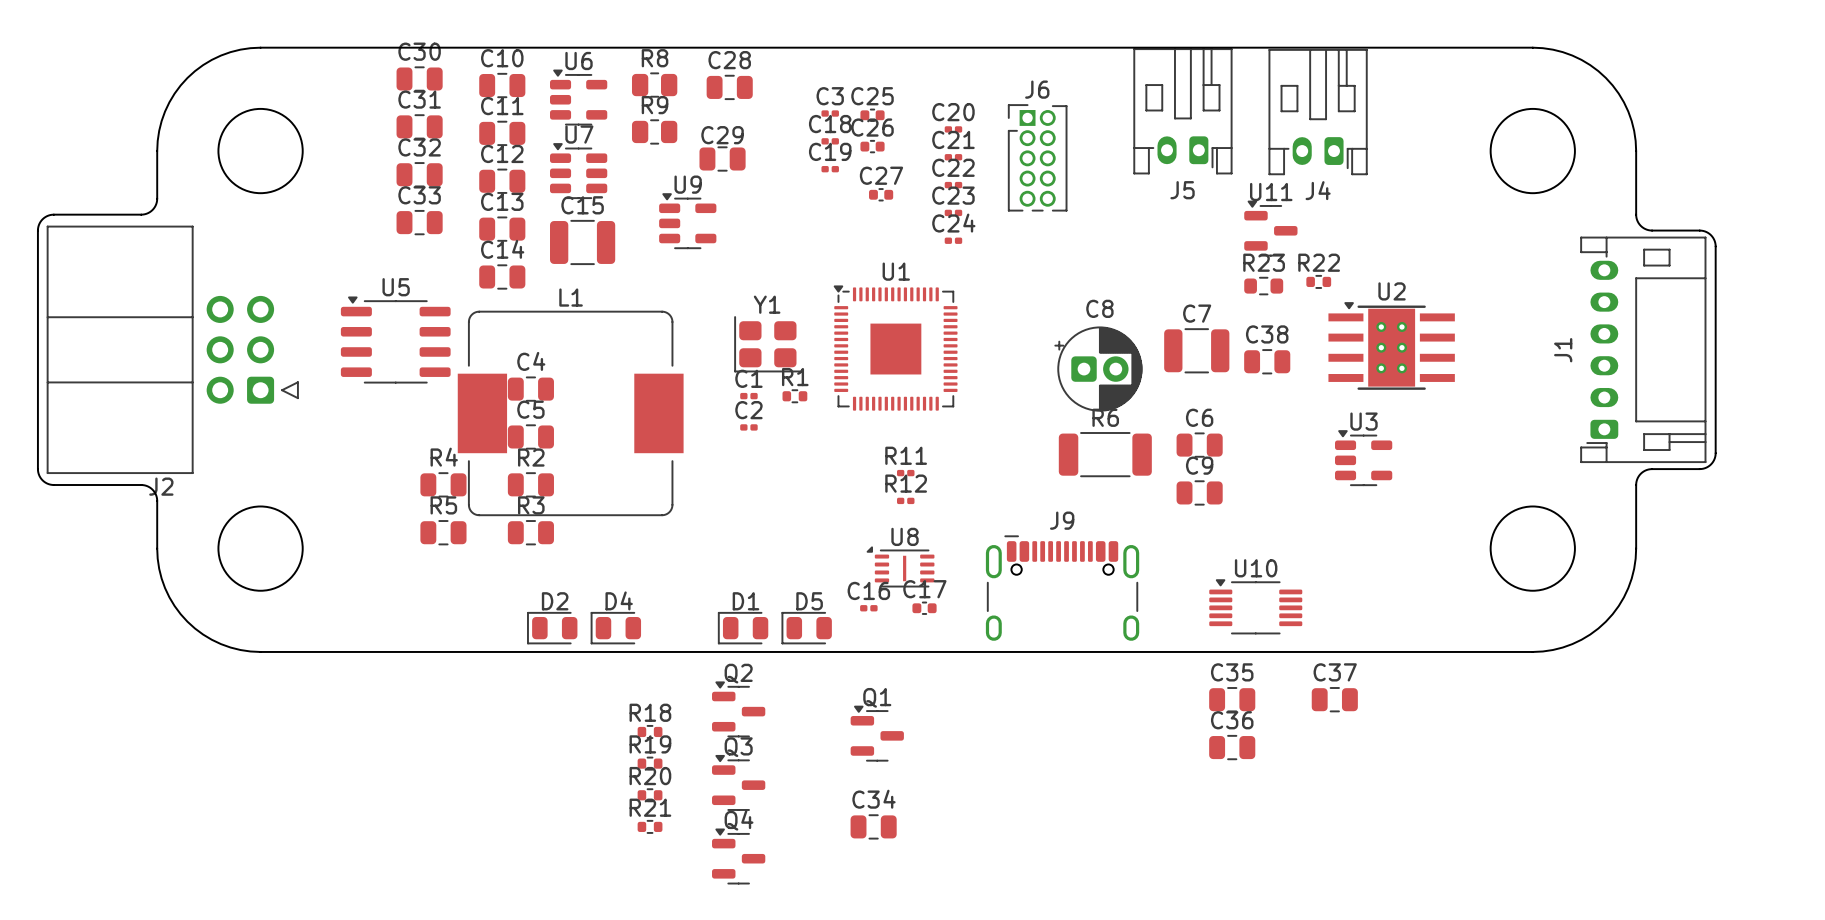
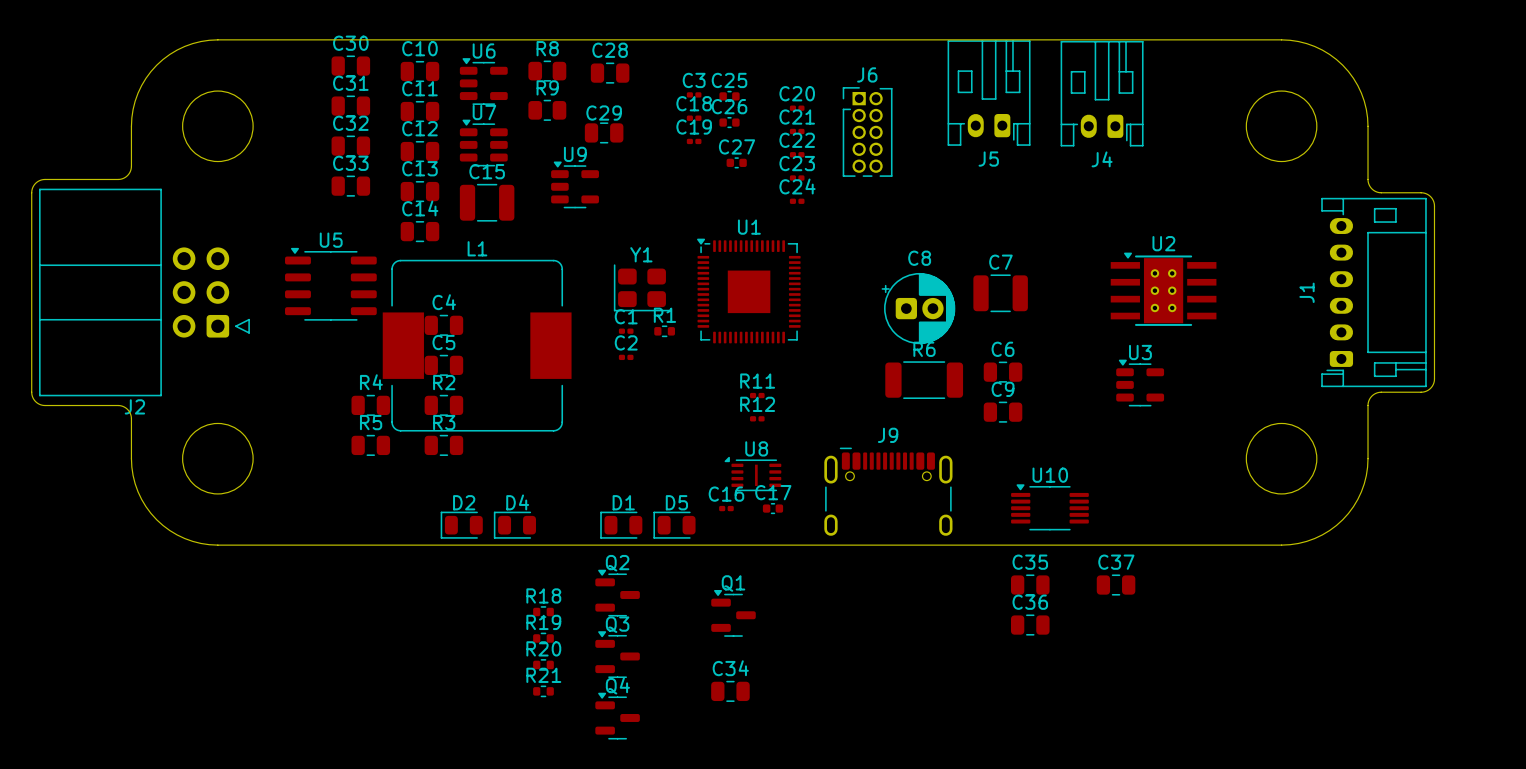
U11: (1270, 228) -> none
R22: (1318, 281) -> none
R23: (1263, 286) -> none
C38: (1267, 361) -> none

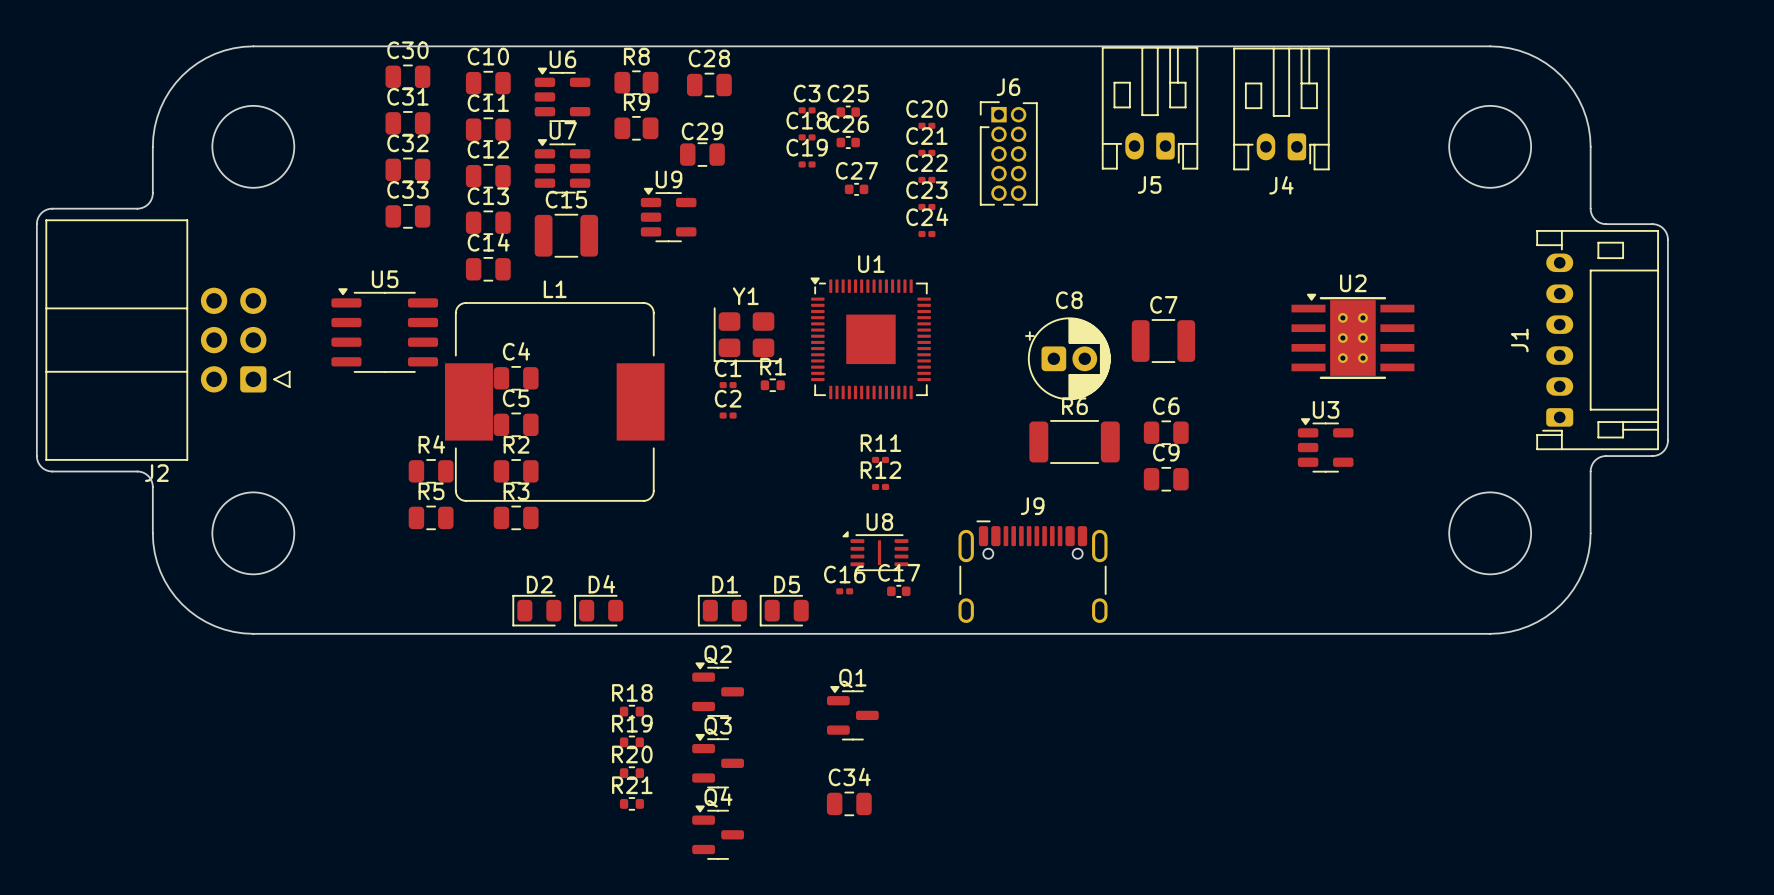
U10: (1049, 507) -> none
C35: (1030, 585) -> none
C37: (1116, 585) -> none
C36: (1030, 625) -> none

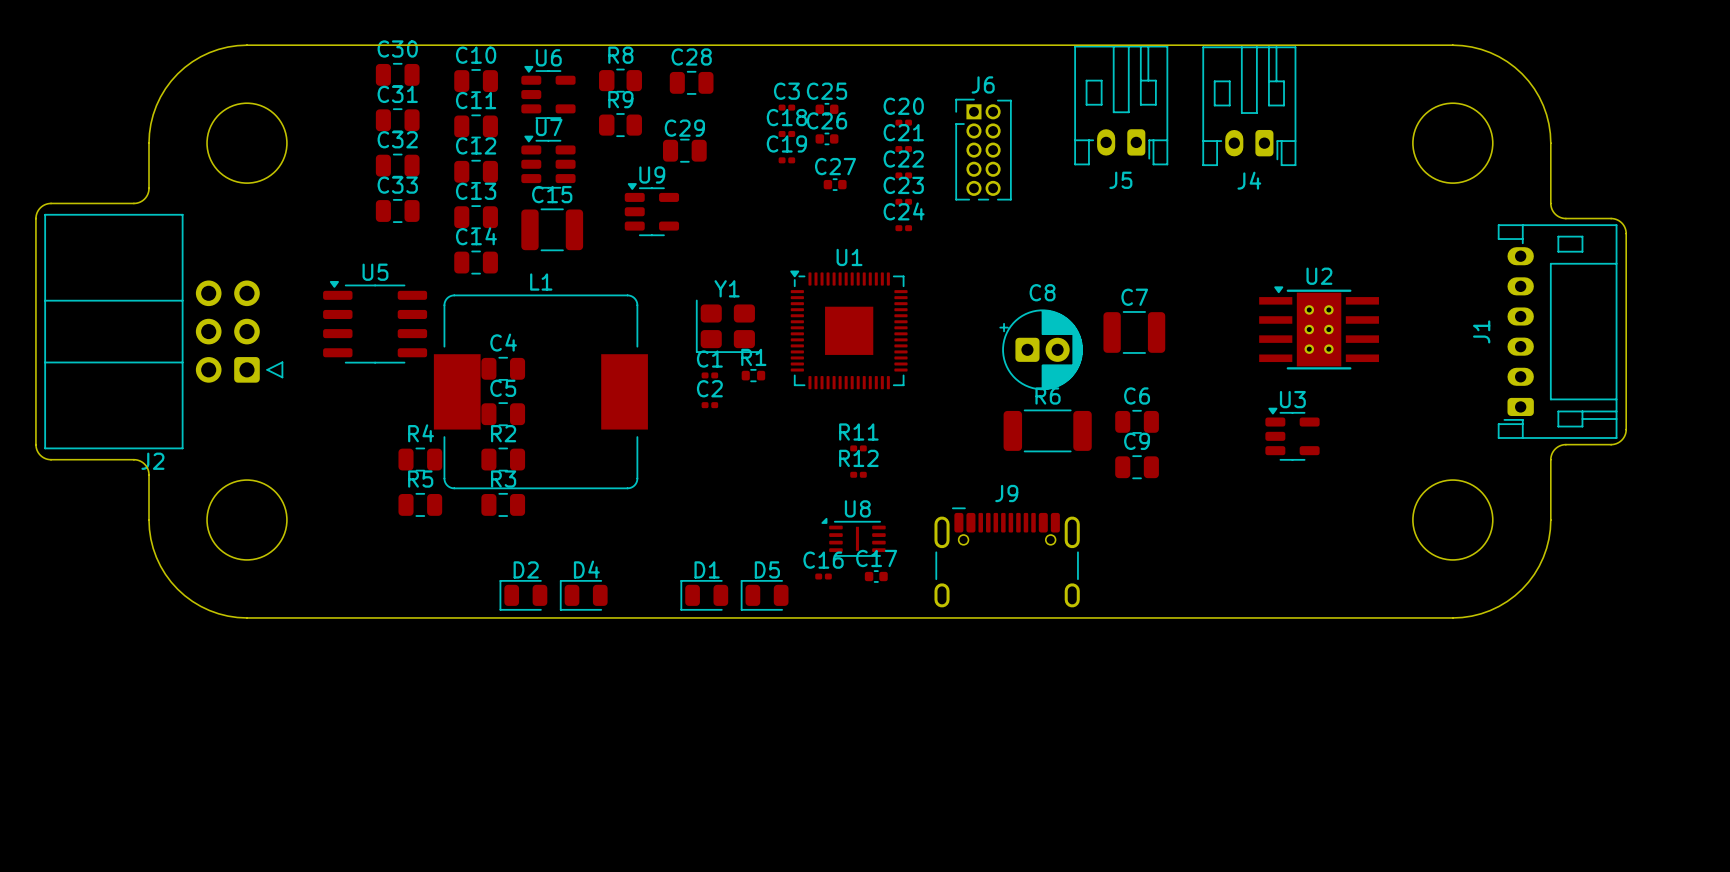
Q2: (718, 689) -> none
R18: (631, 711) -> none
Q1: (852, 713) -> none
R19: (631, 742) -> none
Q3: (718, 761) -> none
R20: (631, 773) -> none
R21: (631, 803) -> none
C34: (849, 803) -> none
Q4: (718, 832) -> none

